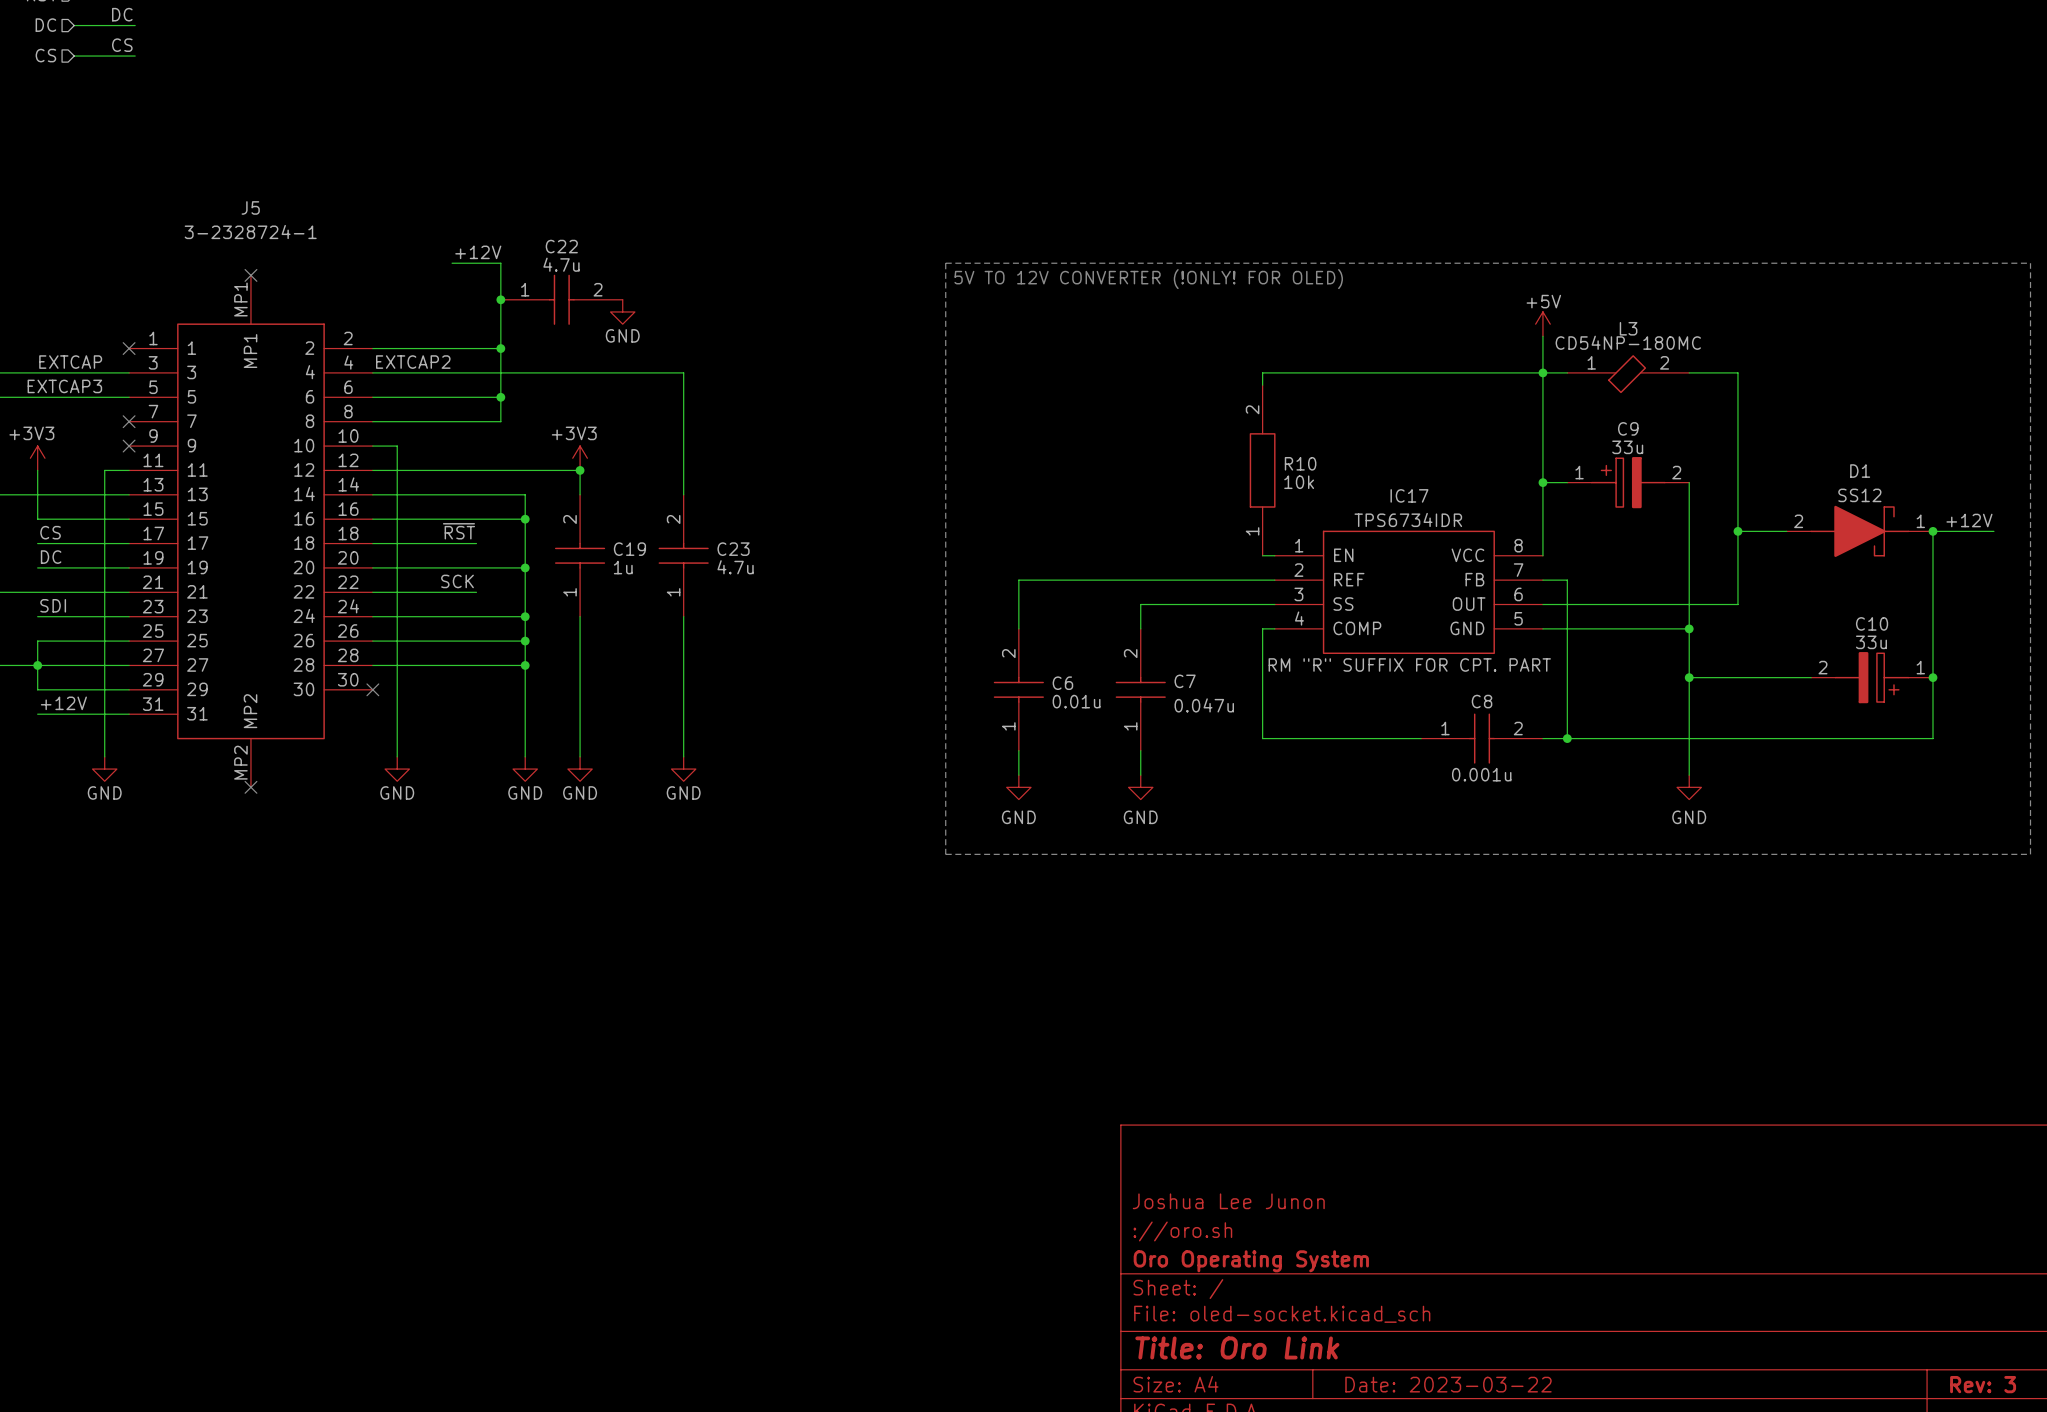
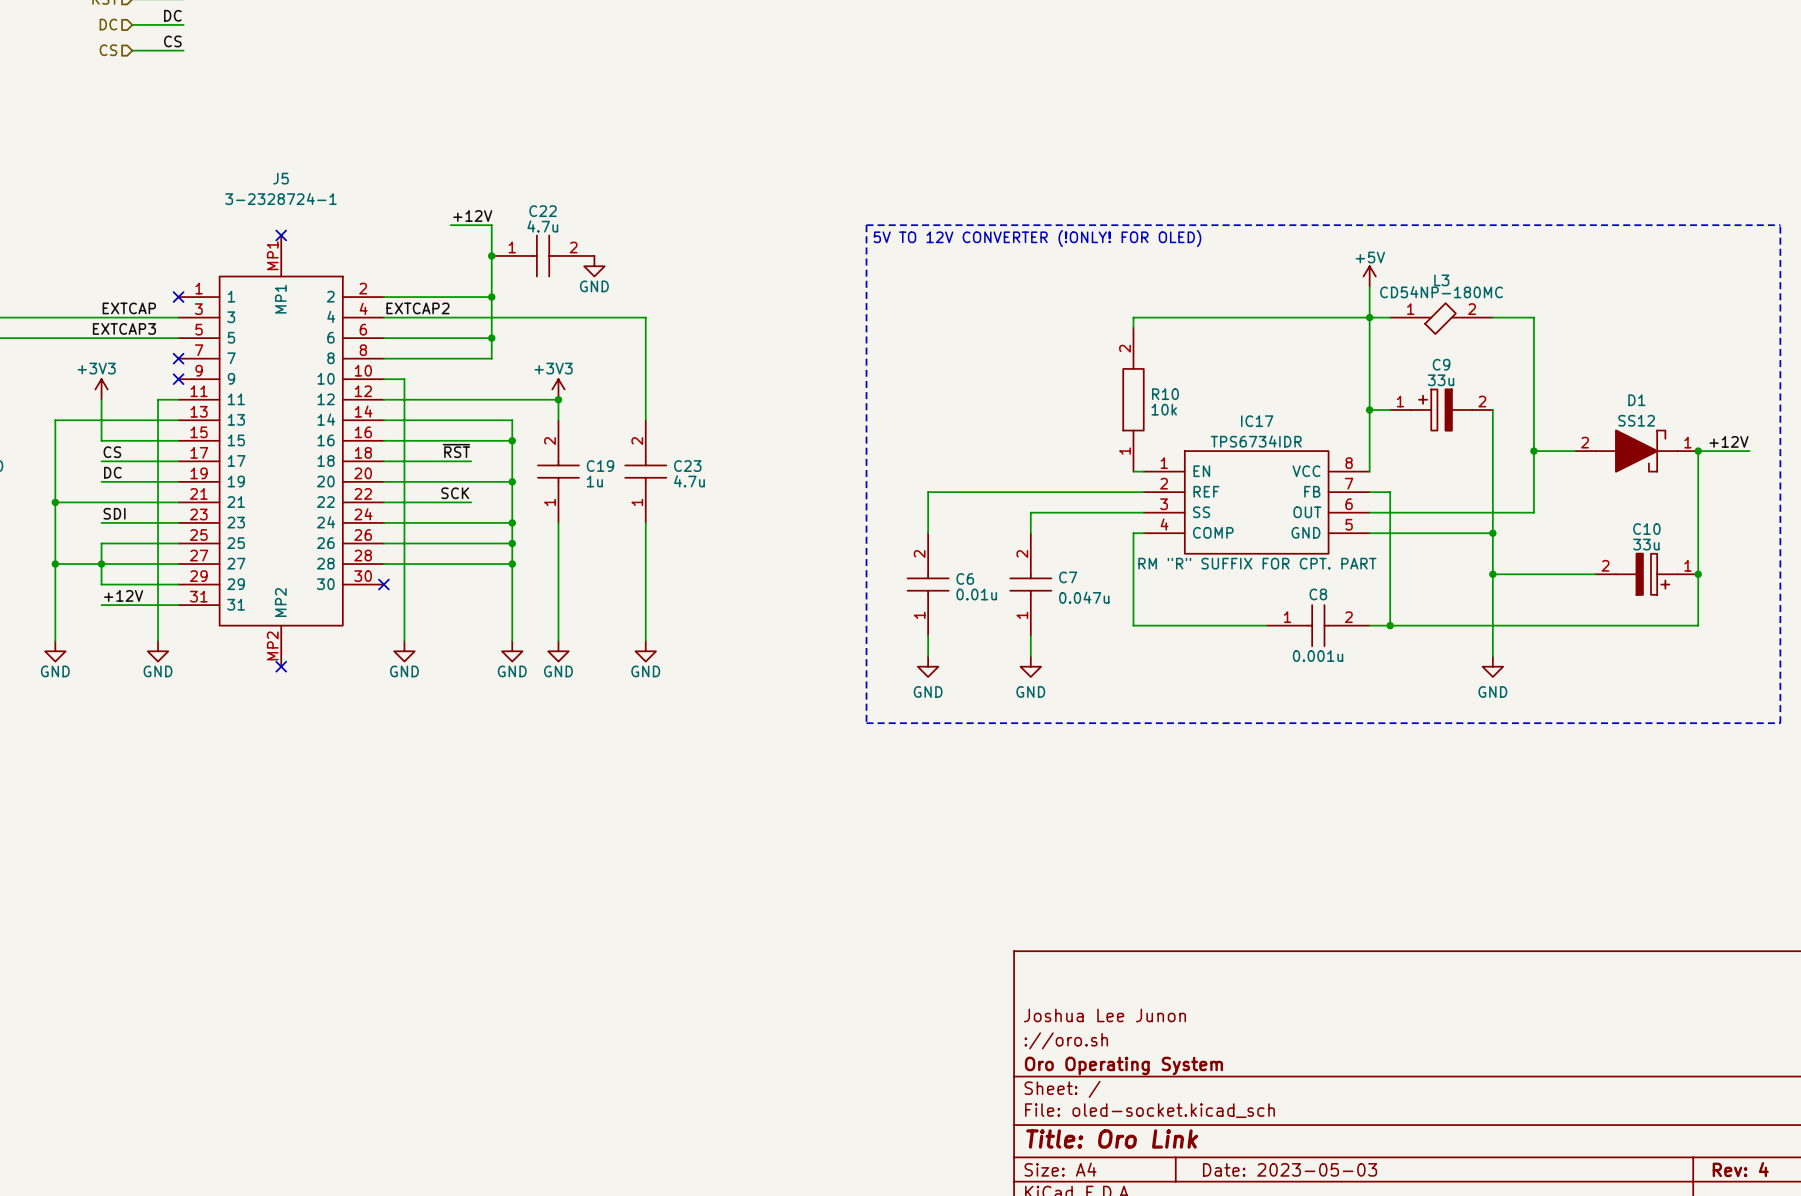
title block: Date: 2023-03-22 (1448, 1384) -> Date: 2023-05-03 (1290, 1169)
title block: Rev: 3 (1983, 1384) -> Rev: 4 (1740, 1169)

